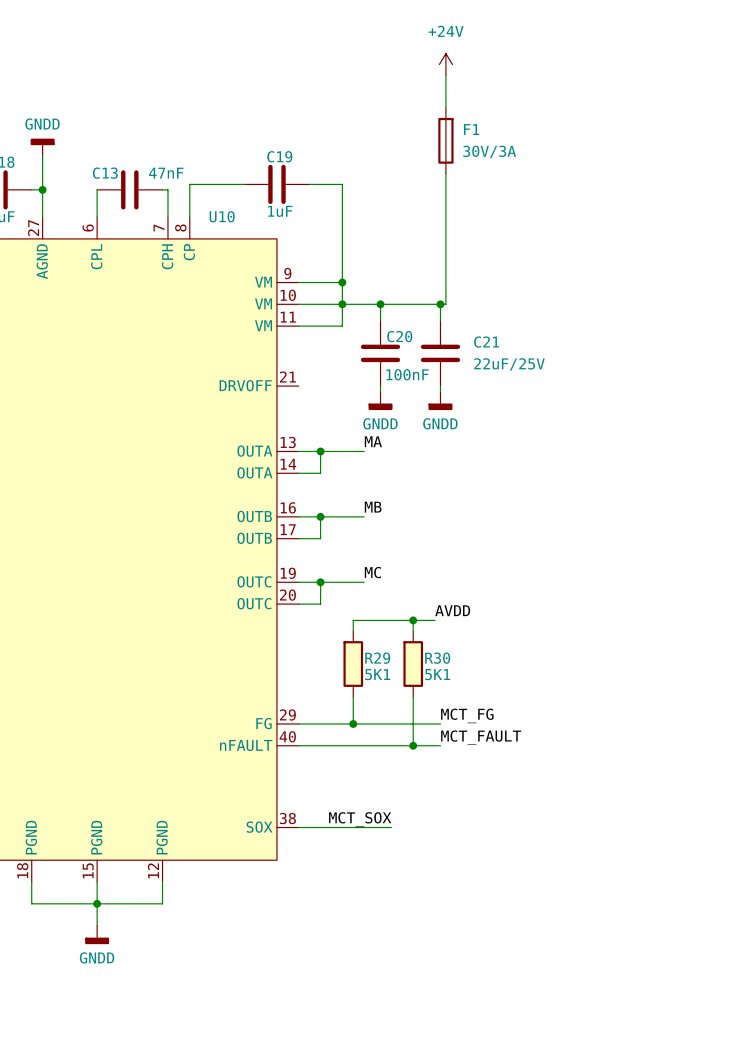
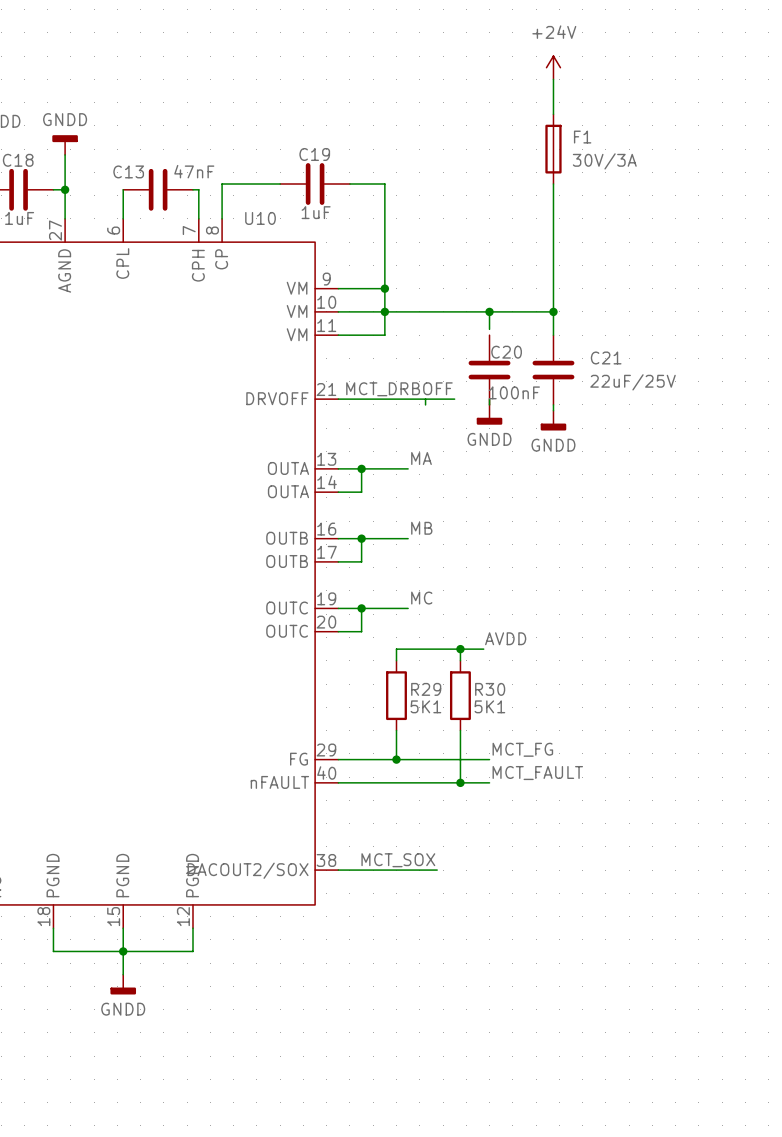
power symbol position: +24V (445, 64) -> +24V (553, 67)
wire: (445, 75) (445, 108) -> (553, 79) (553, 114)
F1 position: (445, 140) -> (553, 149)
wire: (445, 173) (445, 304) -> (553, 311) (495, 311)
wire: none -> (553, 184) (553, 335)
wire: (380, 304) (380, 320) -> none
junction: (380, 304) -> none
junction: none -> (553, 311)
C20 position: (380, 353) -> (489, 370)
C21 position: (440, 353) -> (553, 370)
label: none -> MCT_DRBOFF (399, 389)
wire: none -> (338, 399) (454, 399)
wire: none -> (553, 404) (553, 410)
power symbol position: GNDD (380, 400) -> GNDD (553, 420)
U10 pin name: SOX (259, 827) -> DACOUT2/SOX (248, 870)

